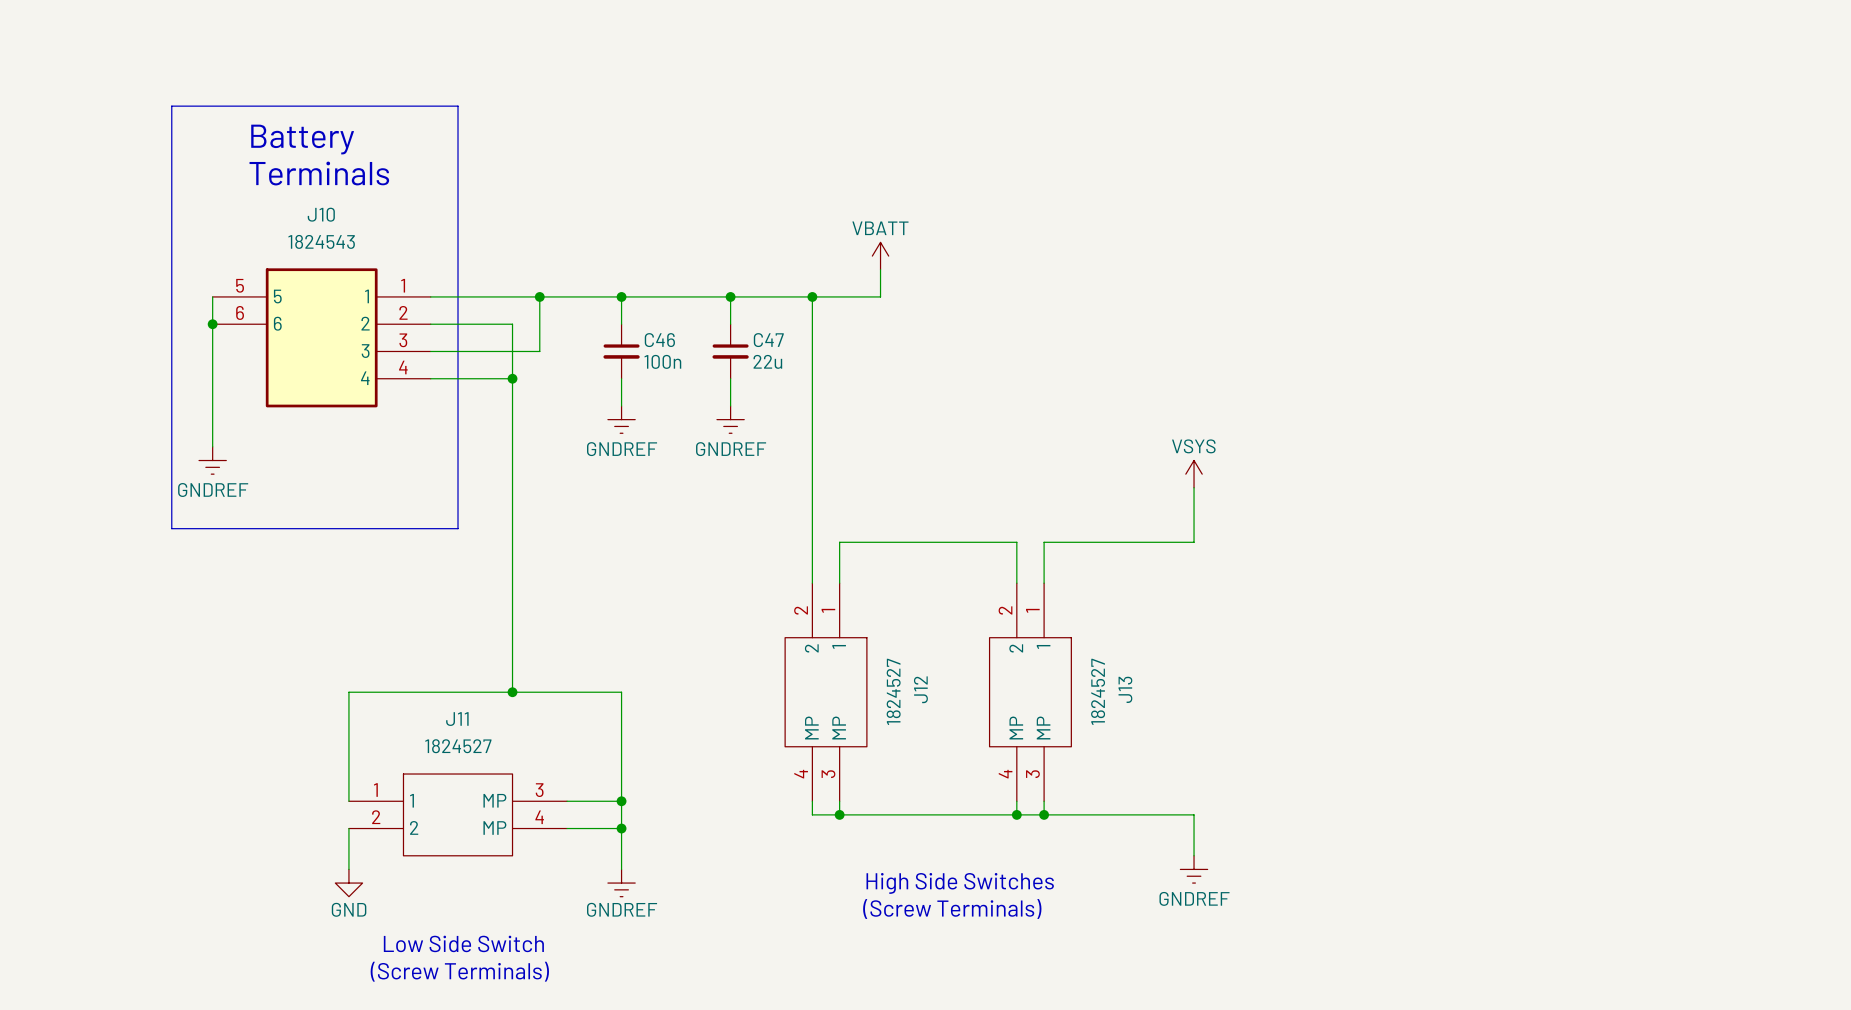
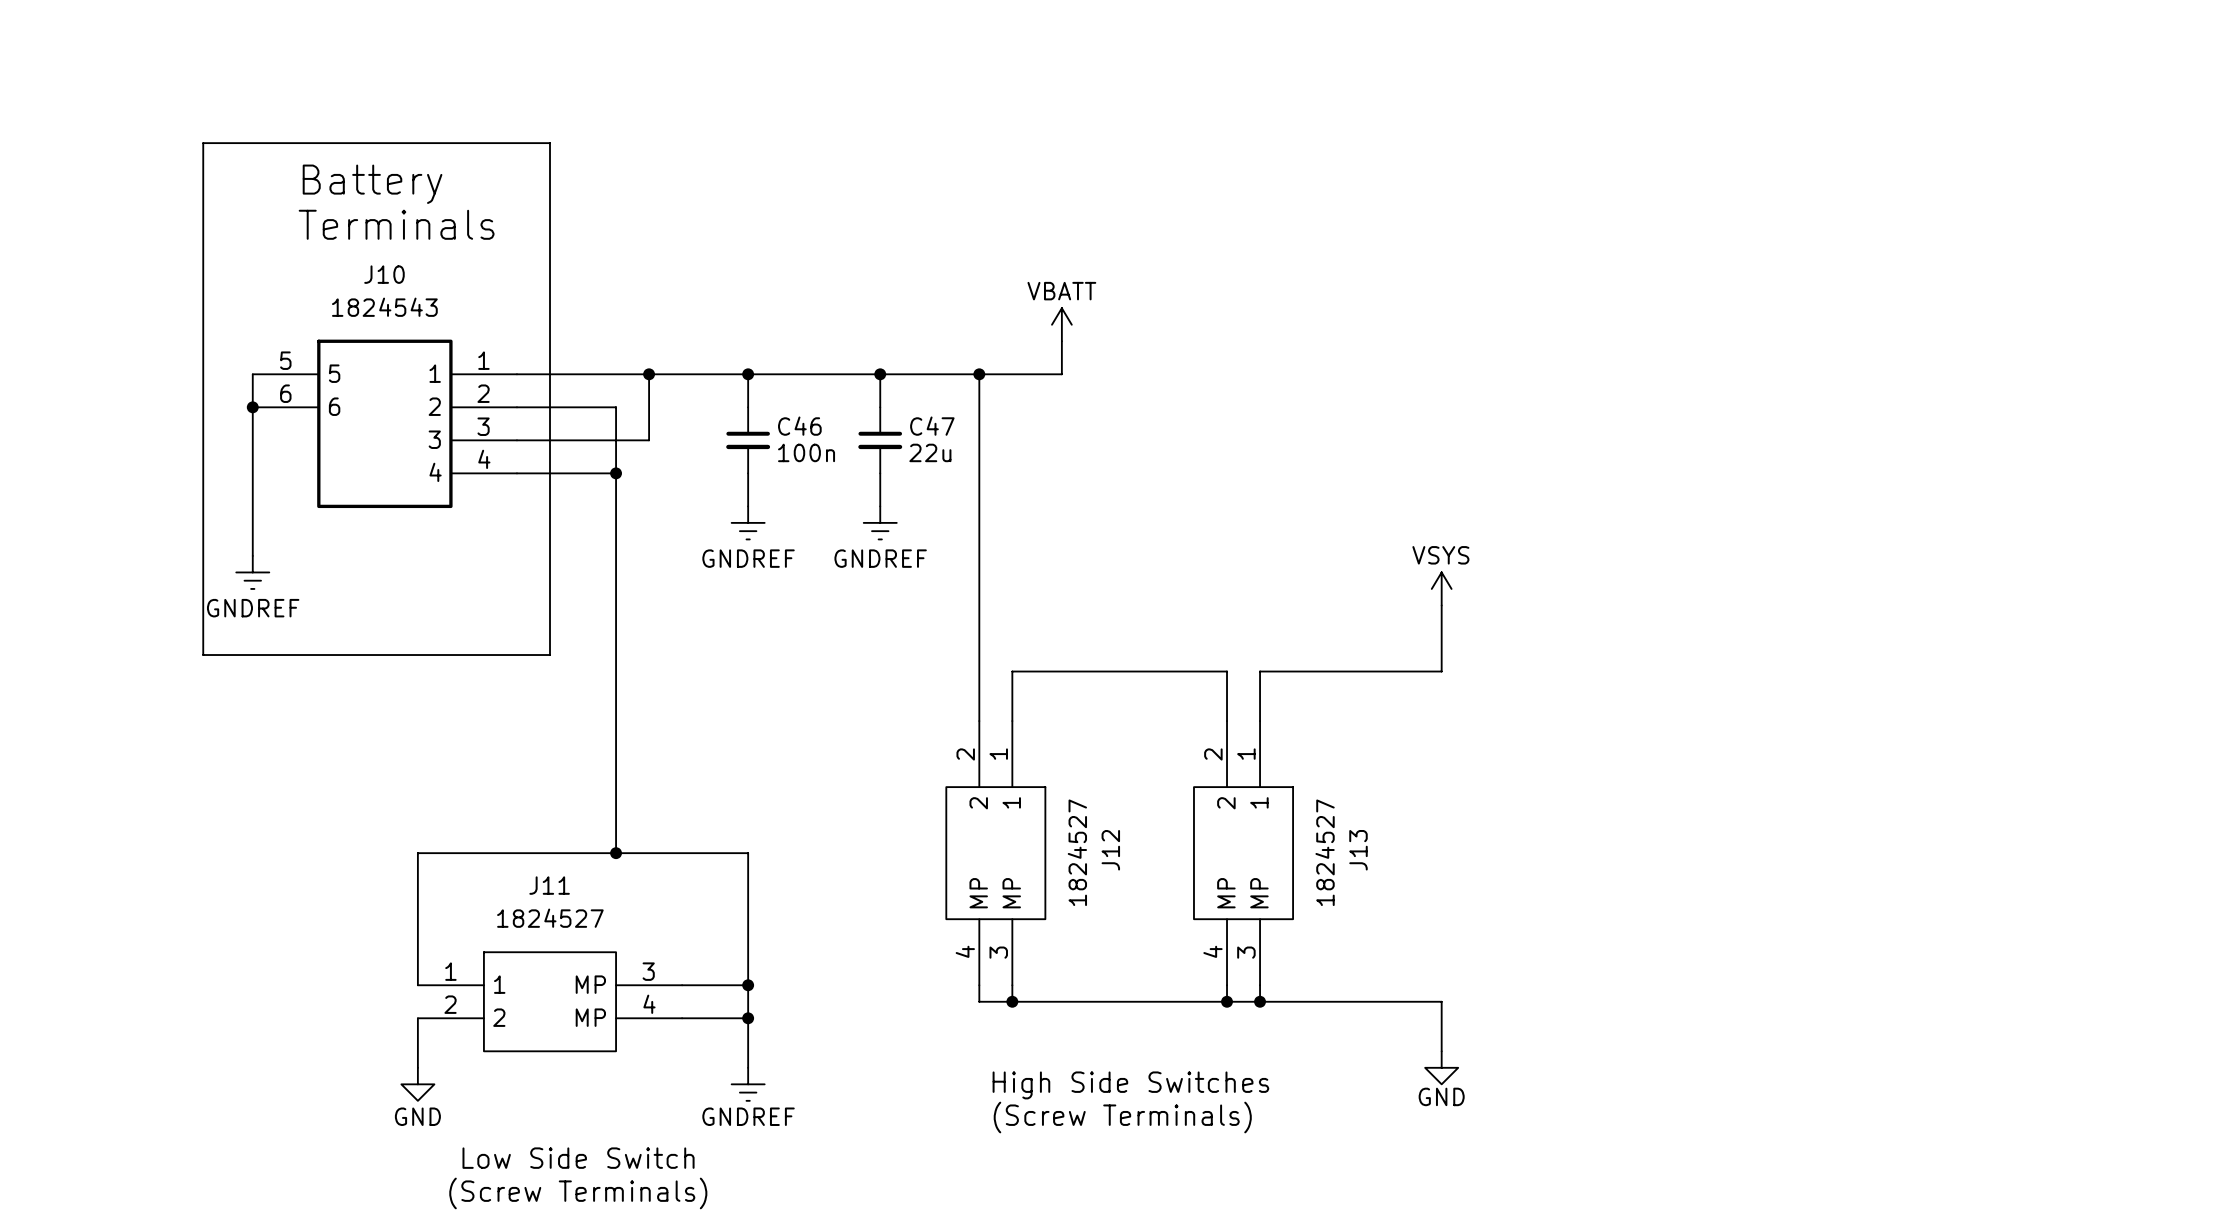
power symbol: GNDREF (1194, 869) -> GND (1441, 1067)

